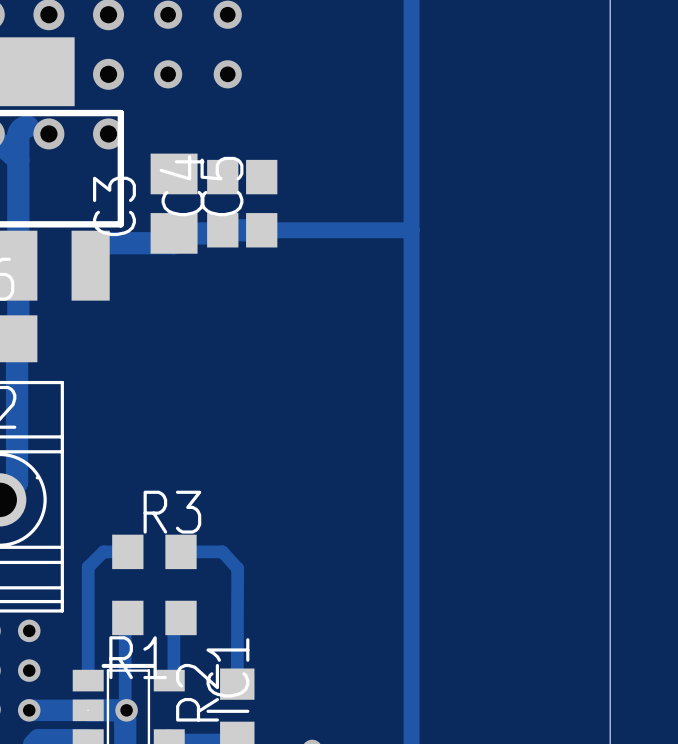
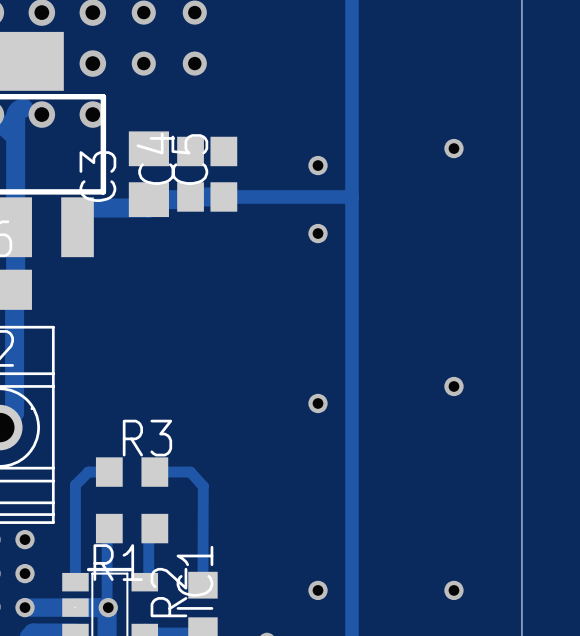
via: none -> (453, 148)
via: none -> (318, 165)
via: none -> (318, 233)
via: none -> (453, 386)
via: none -> (318, 403)
via: none -> (318, 590)
via: none -> (453, 590)

